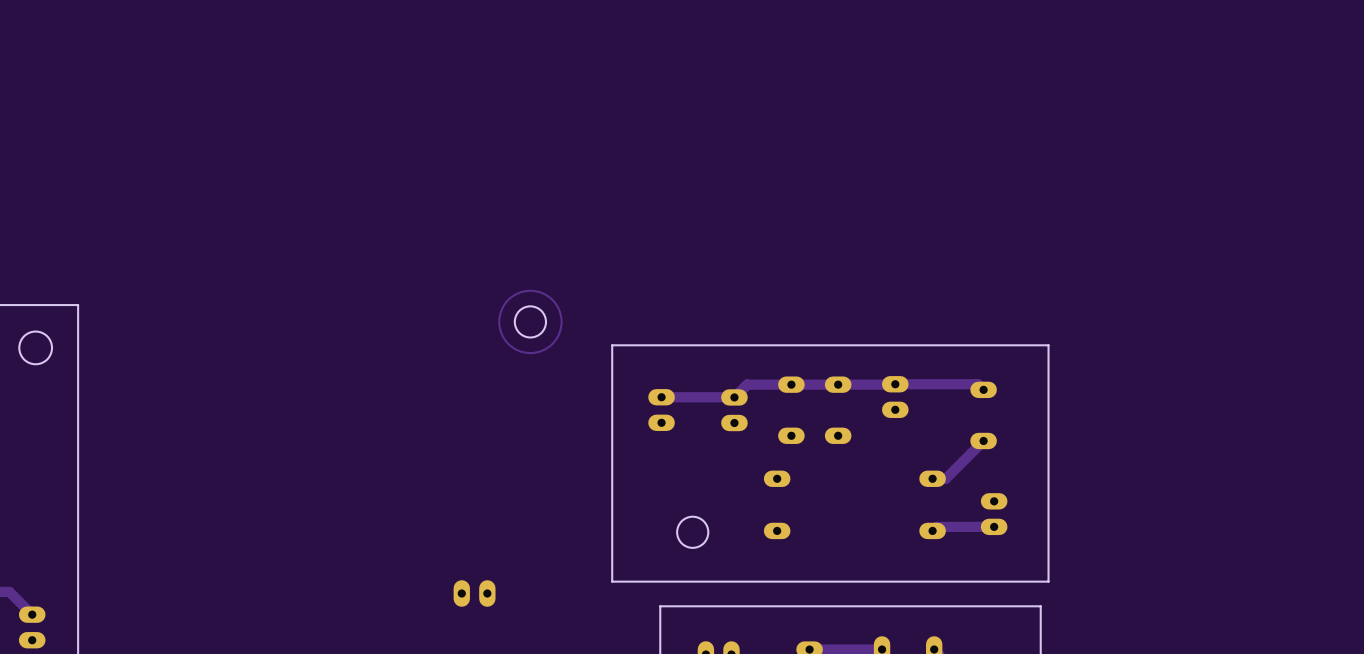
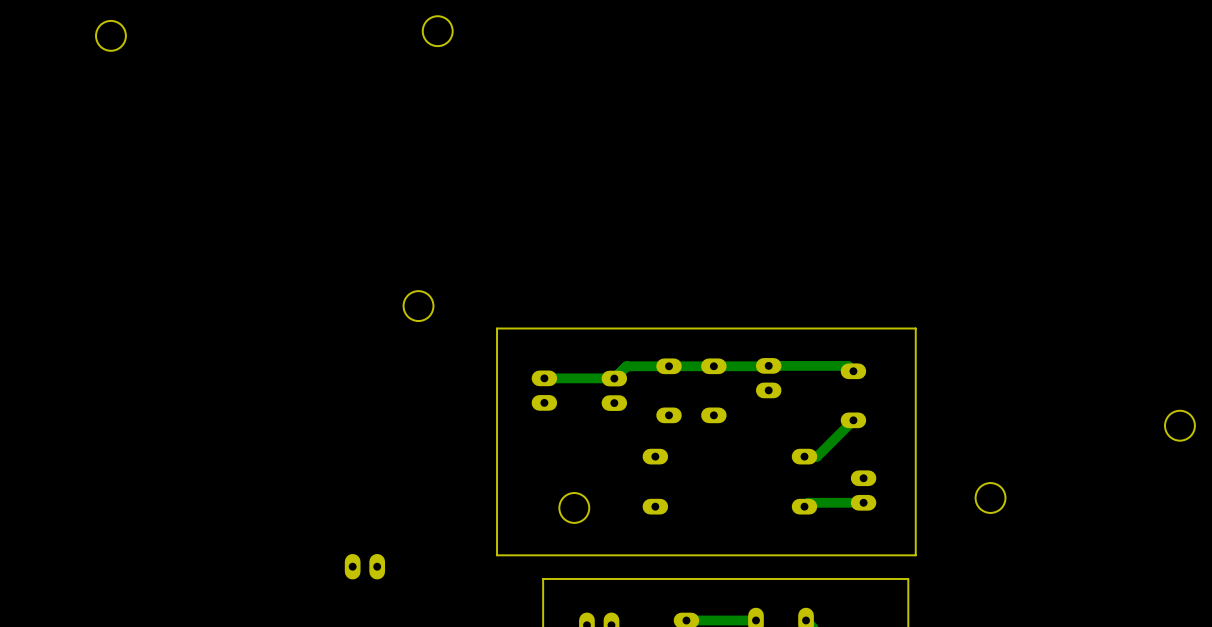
round board edge: none -> [421, 15, 454, 48]
round board edge: none -> [95, 19, 127, 52]
drawing: [498, 289, 563, 355] -> none
round board edge: none -> [1164, 409, 1196, 442]
round board edge: none -> [974, 482, 1007, 514]

